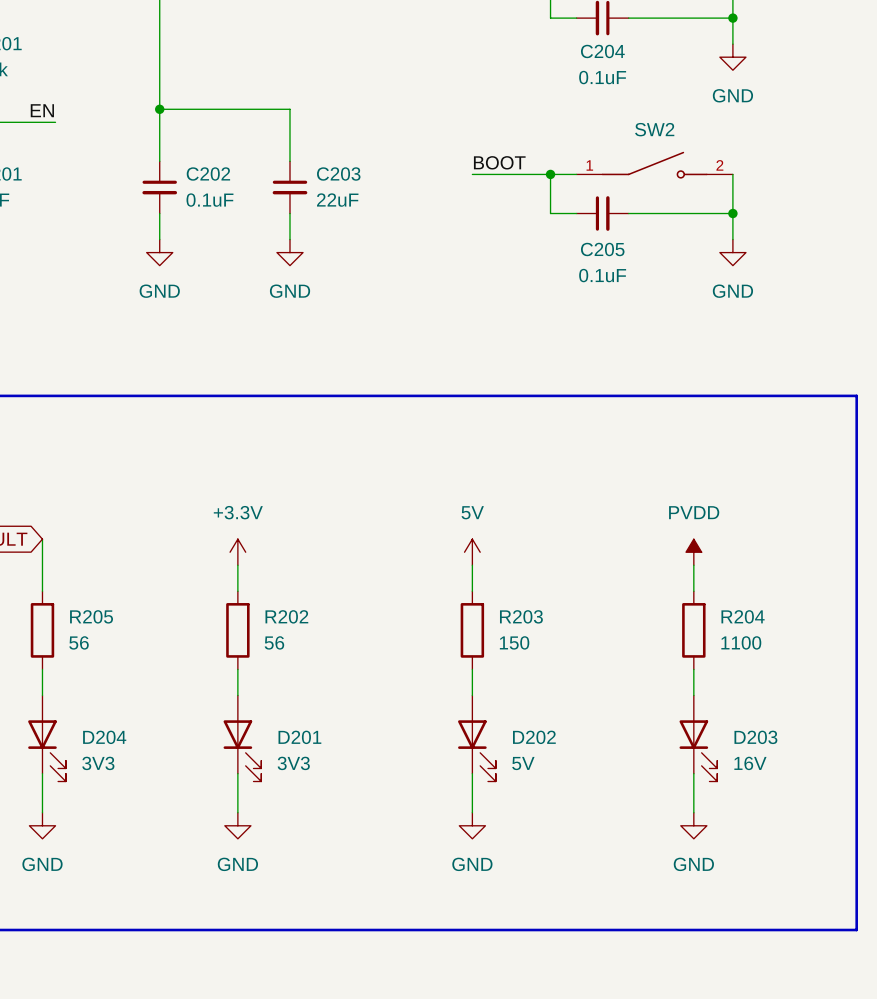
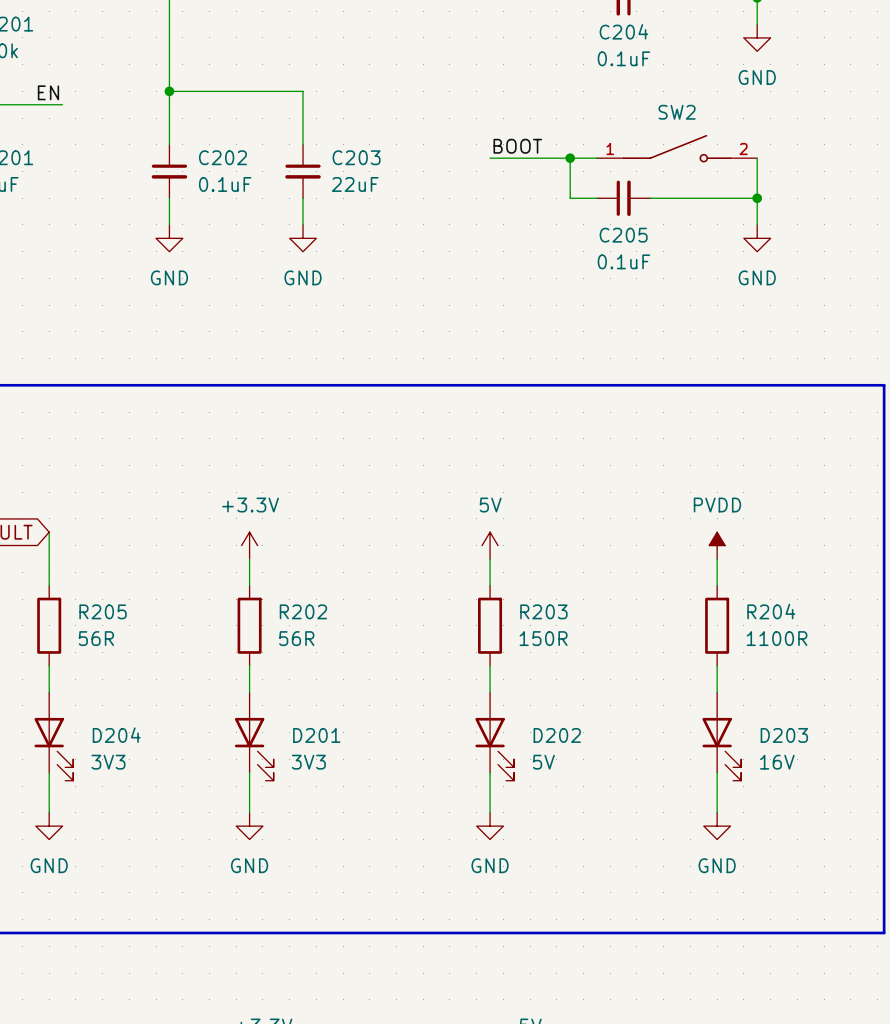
R205 value: 56 (79, 642) -> 56R (96, 638)
R202 value: 56 (274, 642) -> 56R (296, 638)
R203 value: 150 (514, 642) -> 150R (543, 638)
R204 value: 1100 (741, 642) -> 1100R (777, 638)

